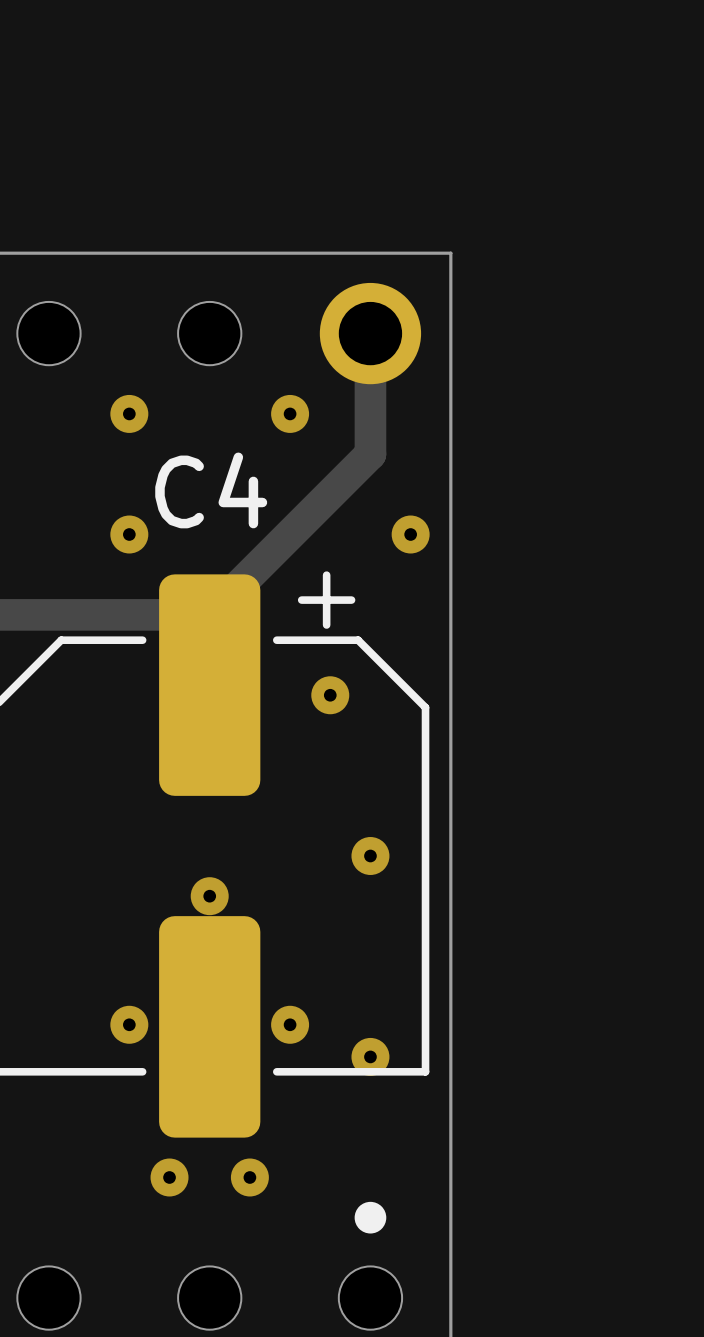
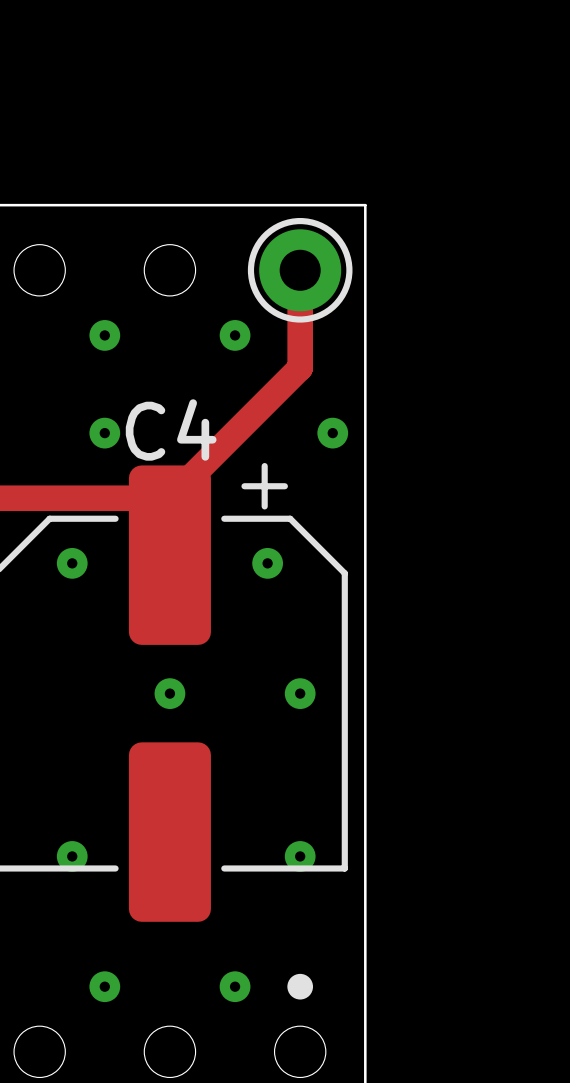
part footprint: [319, 282, 422, 385] -> [247, 217, 353, 323]
C4 name position: C4 (211, 490) -> C4 (171, 429)
via: none -> (72, 563)
via position: (209, 896) -> (169, 693)
via position: (129, 1024) -> (72, 856)
via: (290, 1024) -> none
via position: (169, 1177) -> (104, 986)
via position: (249, 1177) -> (235, 986)

